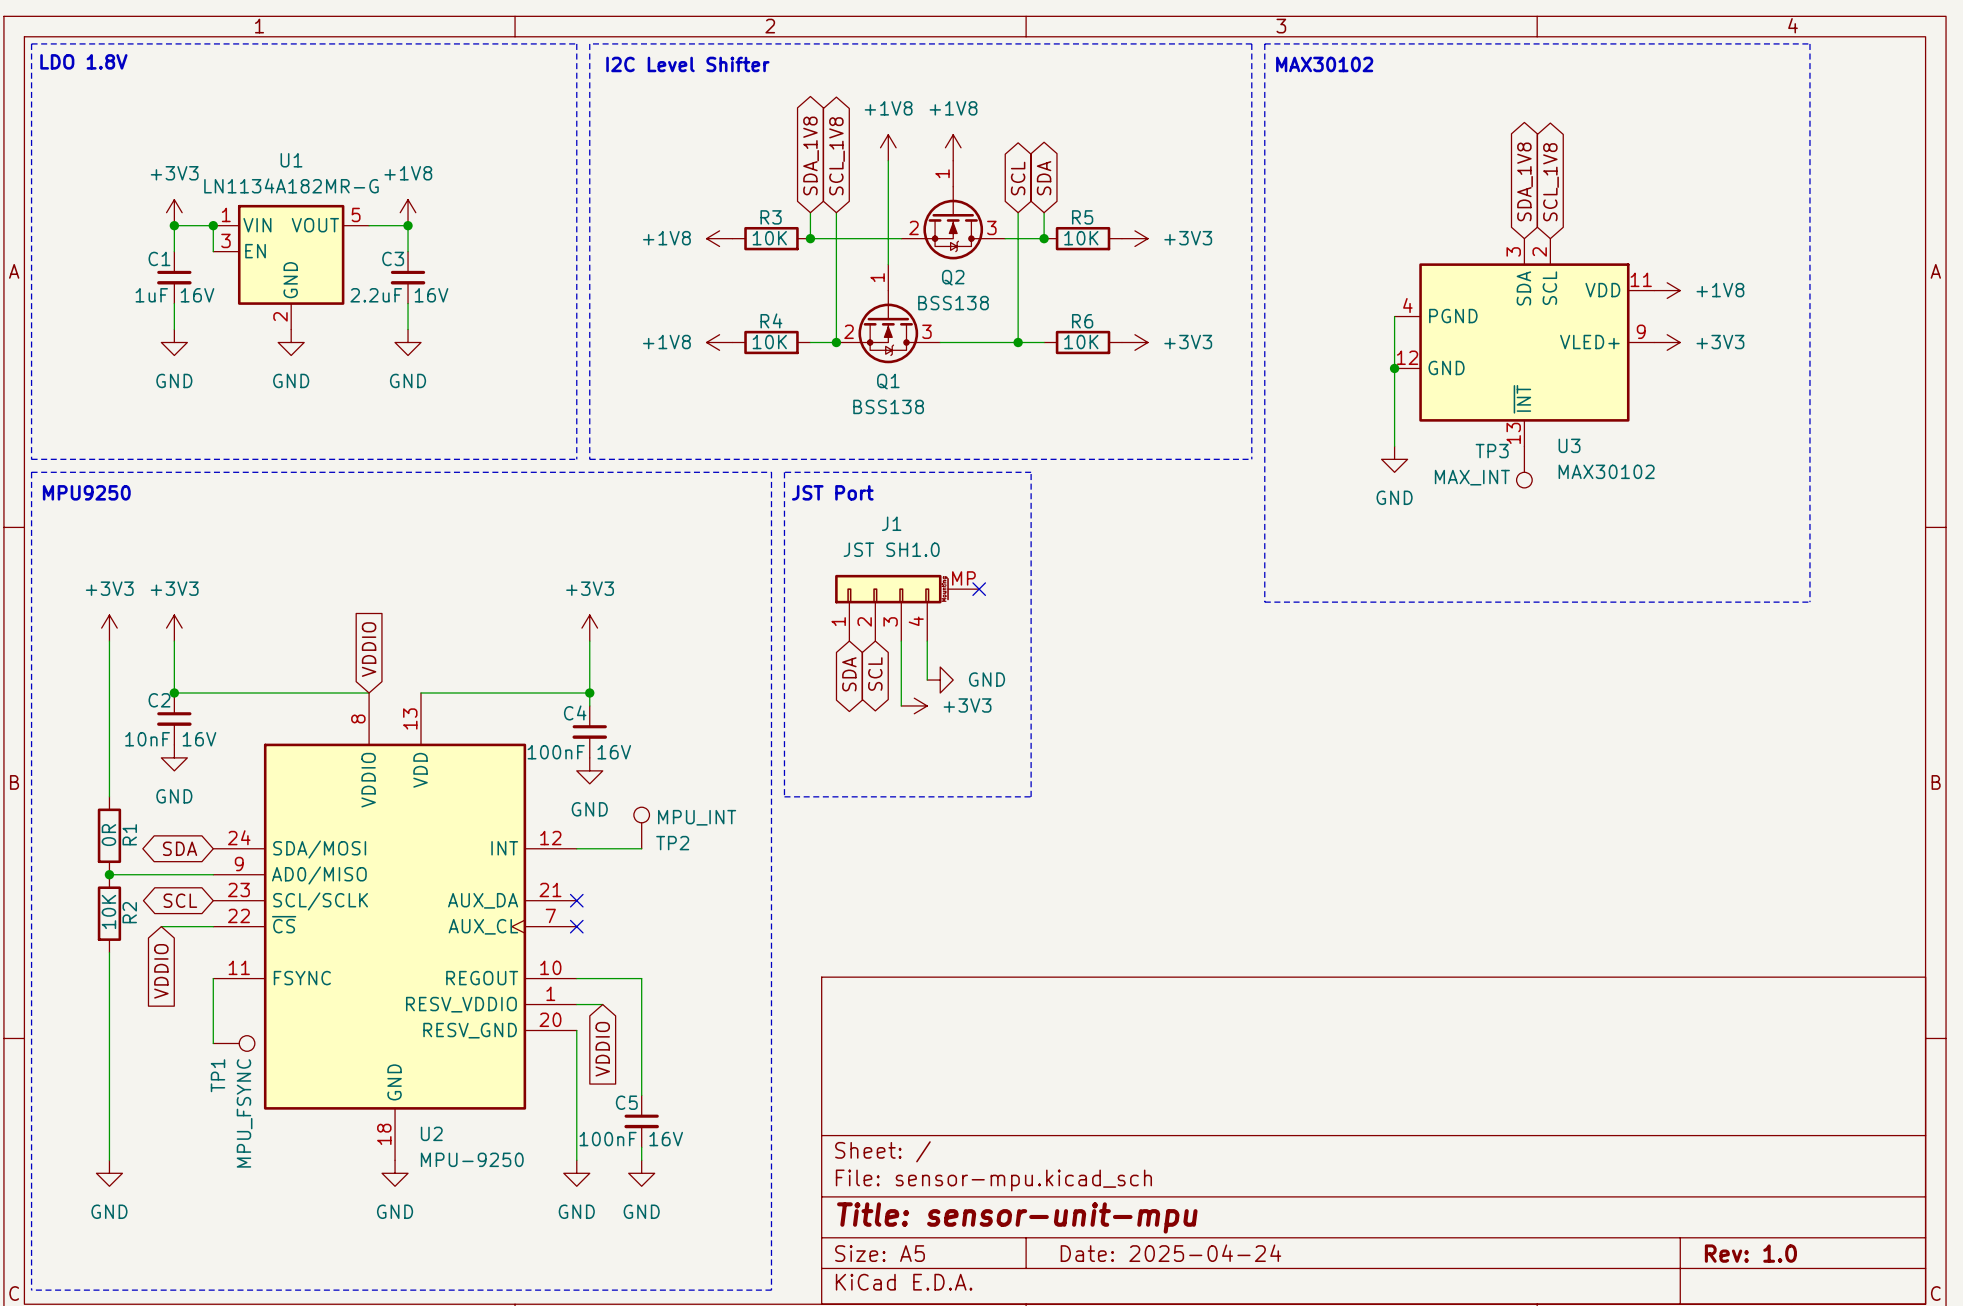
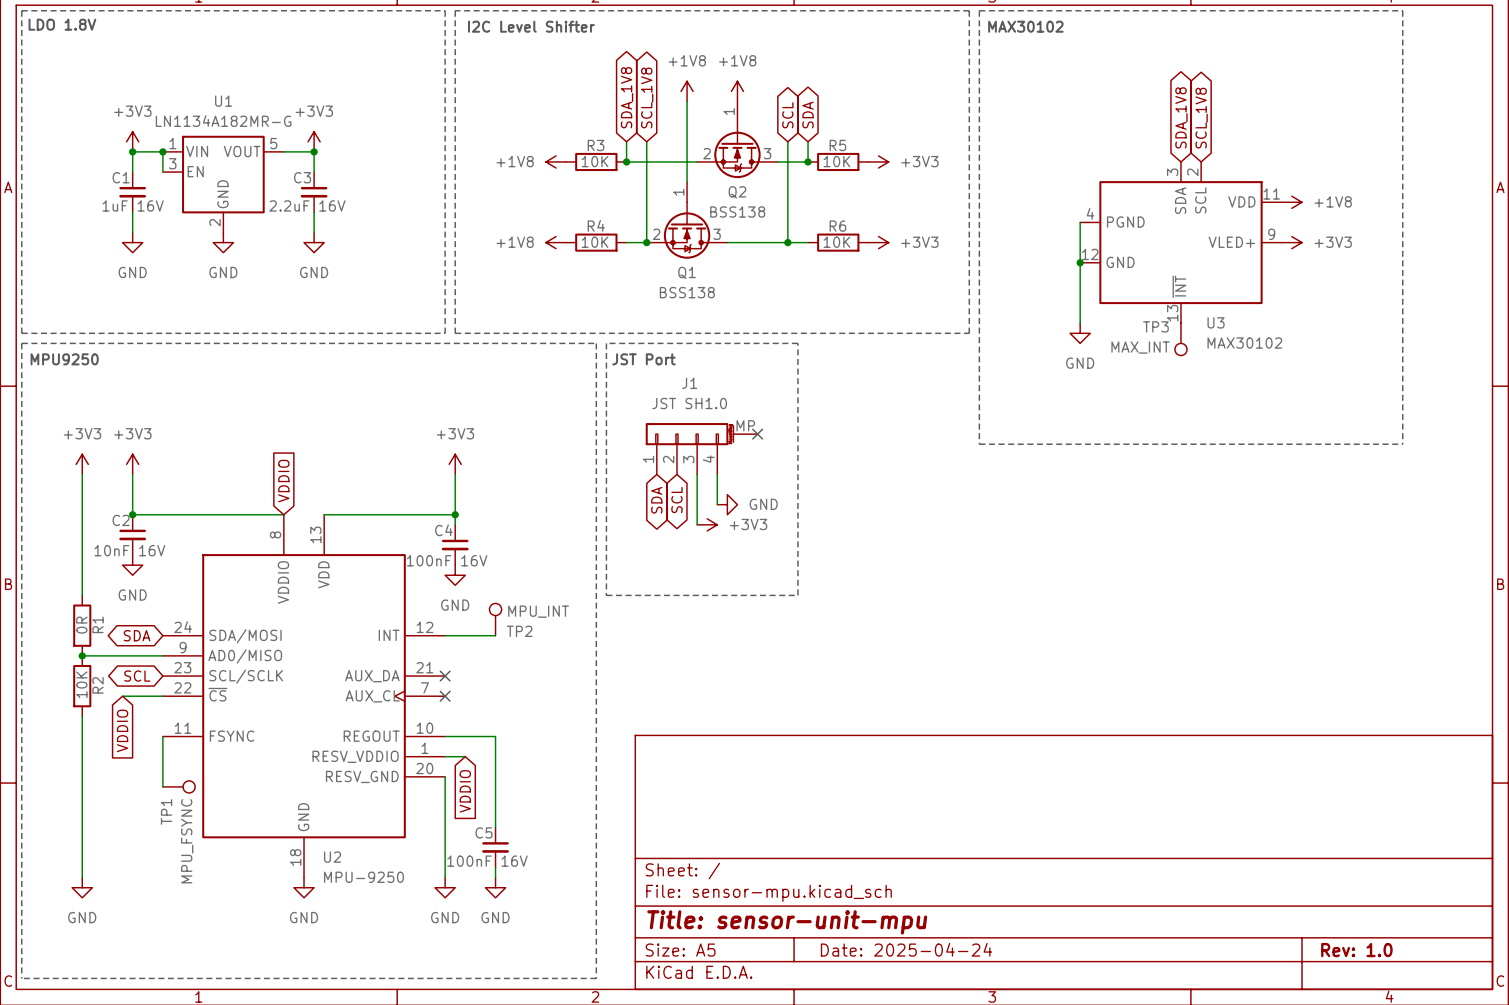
power symbol: +1V8 (408, 212) -> +3V3 (314, 141)

